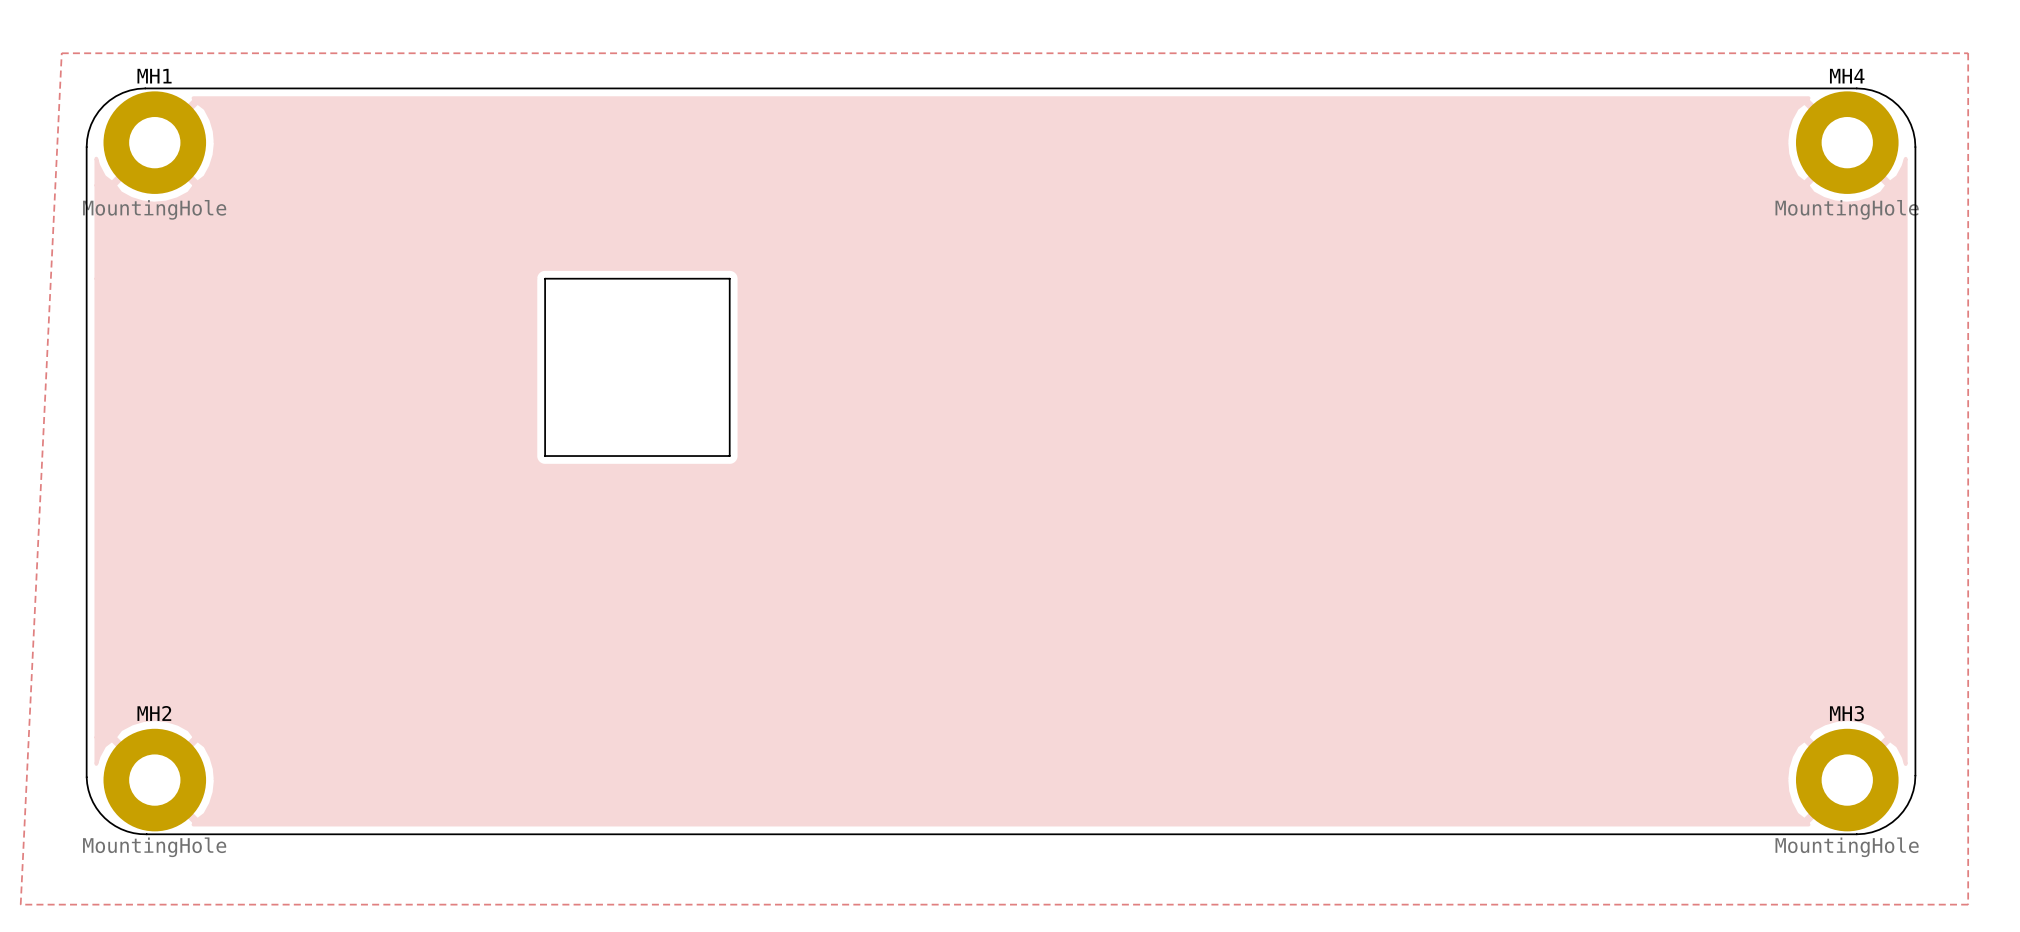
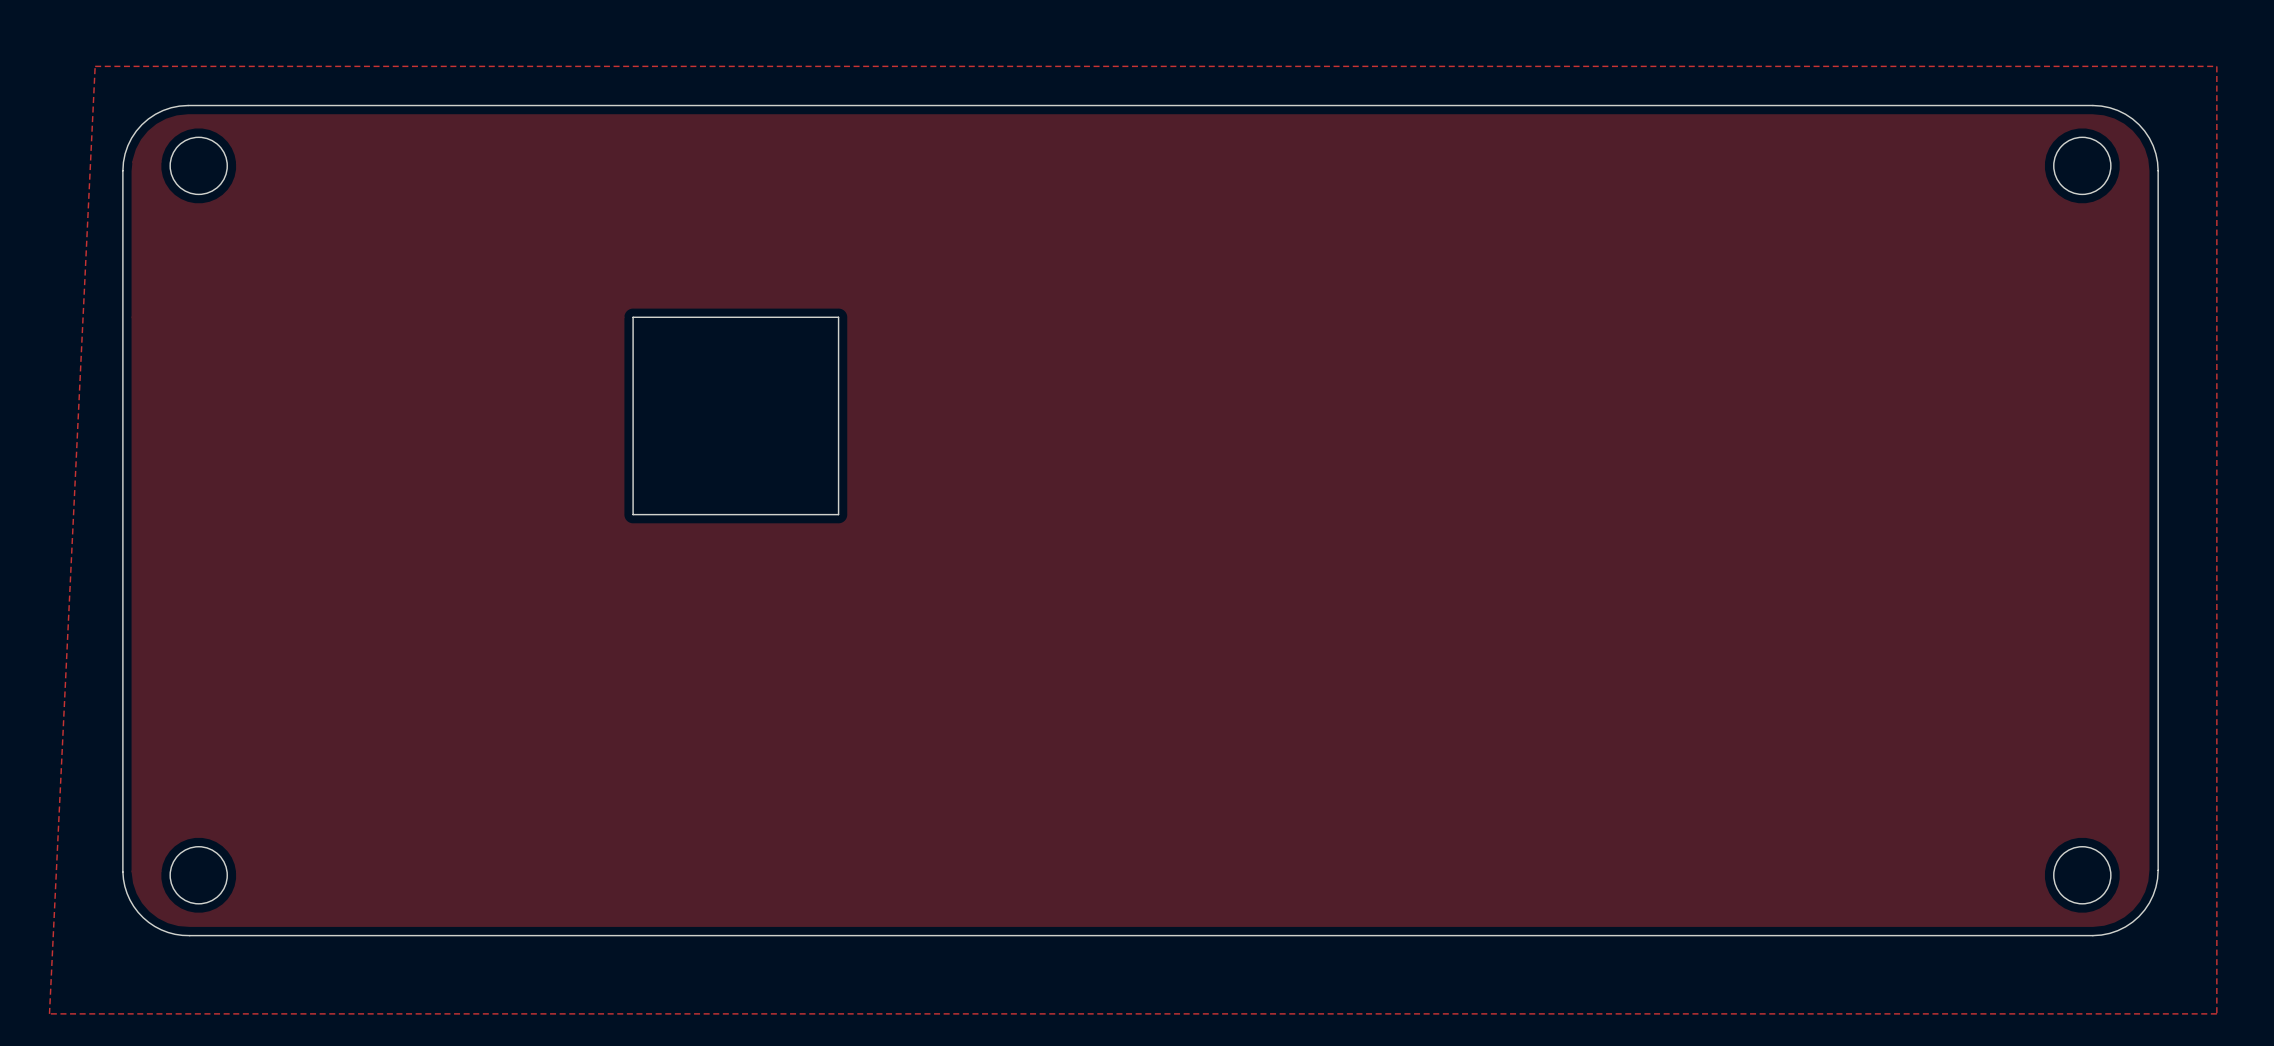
round board edge: none -> [169, 136, 228, 195]
round board edge: none -> [2053, 136, 2112, 195]
MH1: MountingHole (154, 142) -> none
MH4: MountingHole (1847, 142) -> none
round board edge: none -> [169, 846, 228, 905]
round board edge: none -> [2053, 846, 2112, 905]
MH2: MountingHole (154, 780) -> none
MH3: MountingHole (1847, 780) -> none

